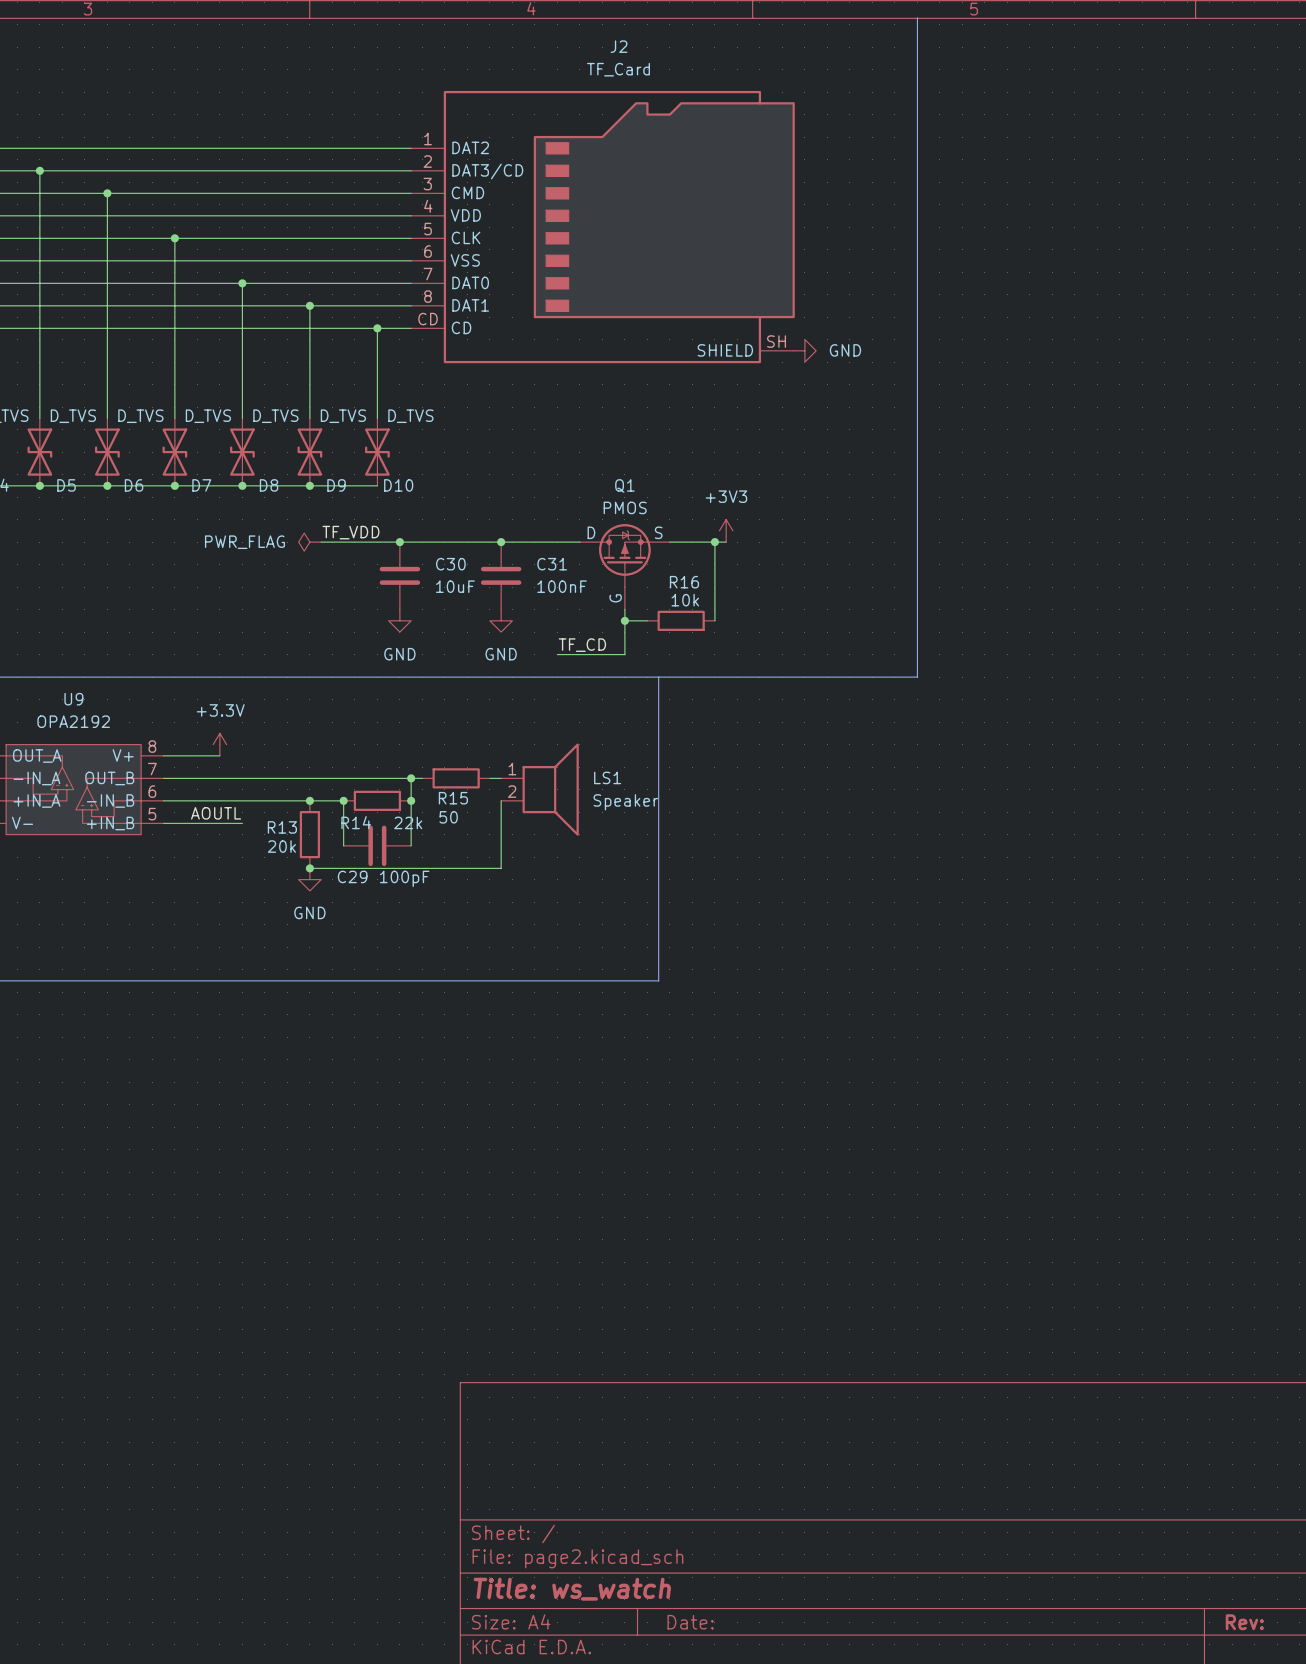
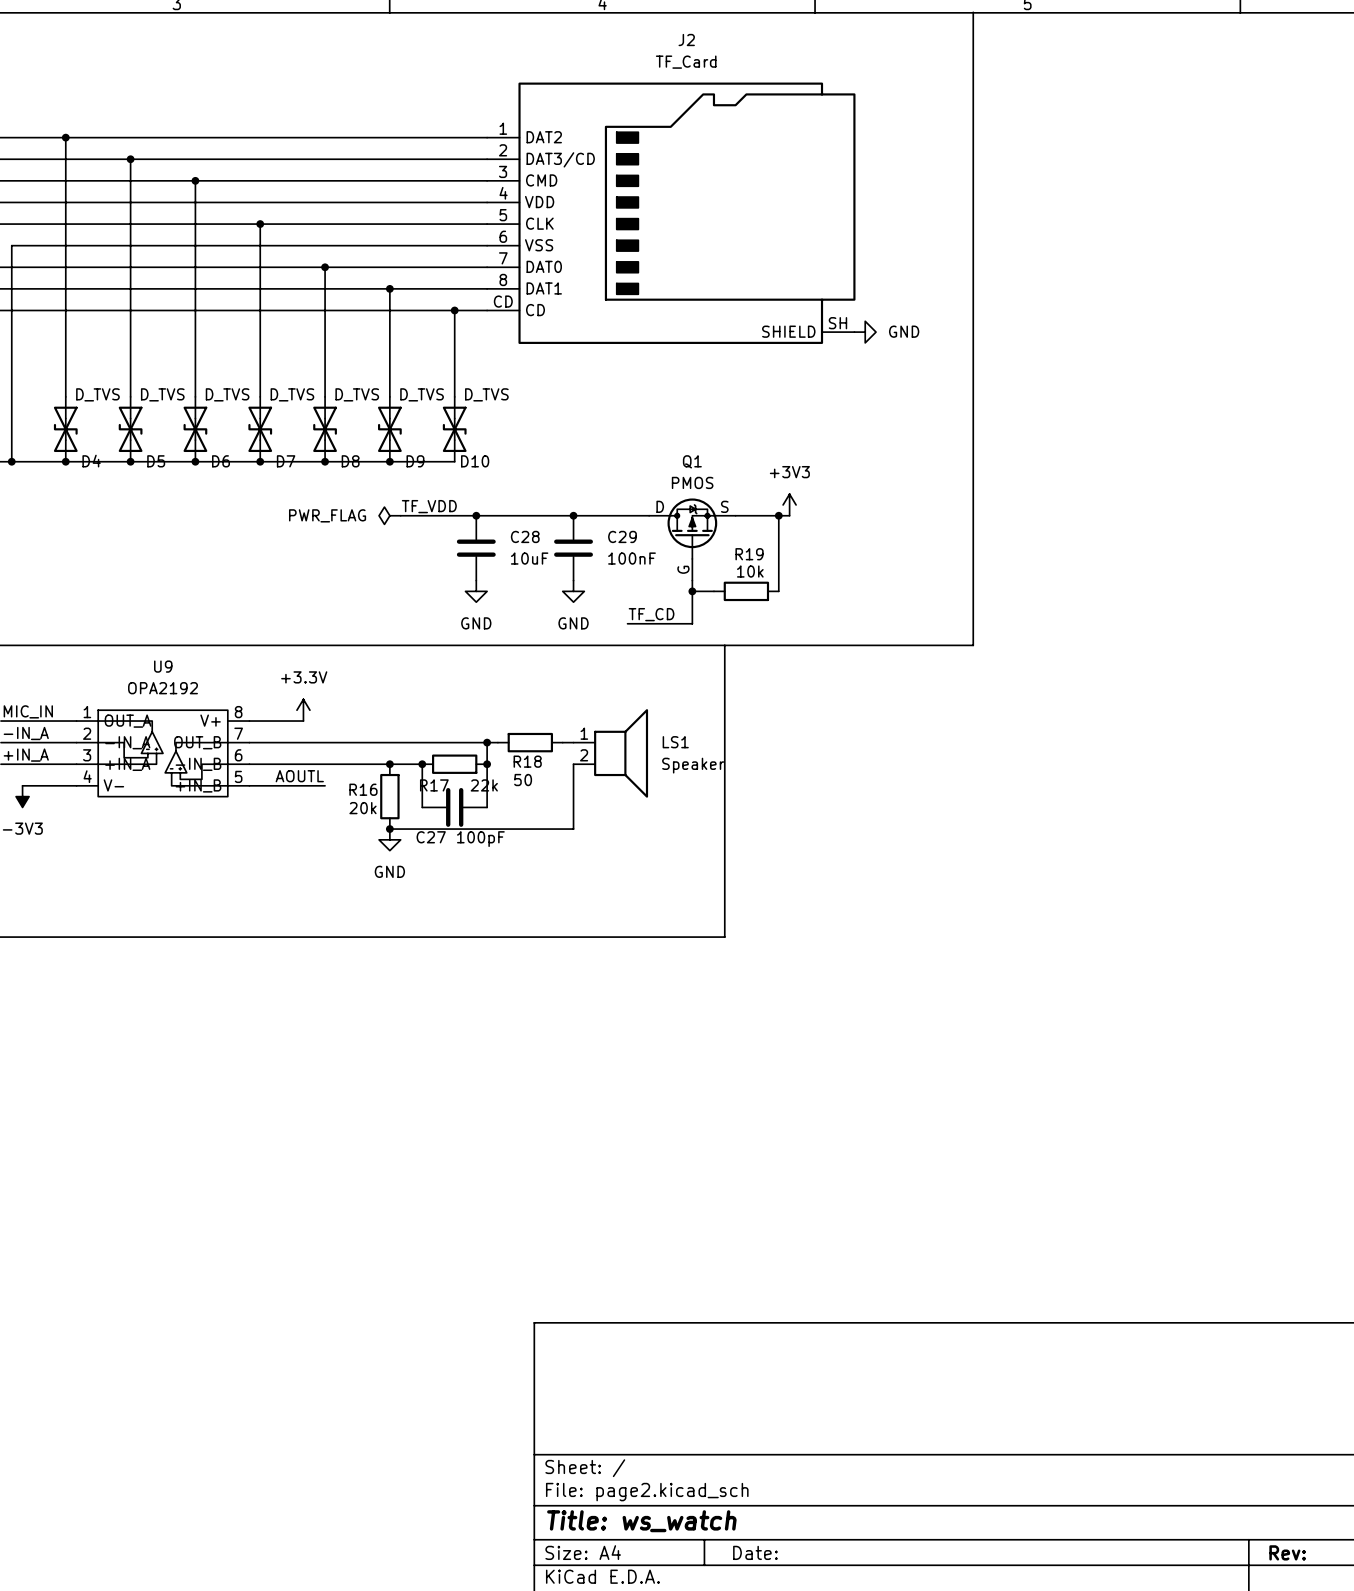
C30 name: C30 (450, 564) -> C28 (525, 536)
C31 name: C31 (552, 564) -> C29 (622, 536)
R16 name: R16 (684, 582) -> R19 (749, 554)
R15 name: R15 (453, 798) -> R18 (527, 761)
R14 name: R14 (356, 822) -> R17 (434, 785)
R13 name: R13 (282, 827) -> R16 (363, 789)
C29 name: C29 (352, 876) -> C27 (431, 837)

